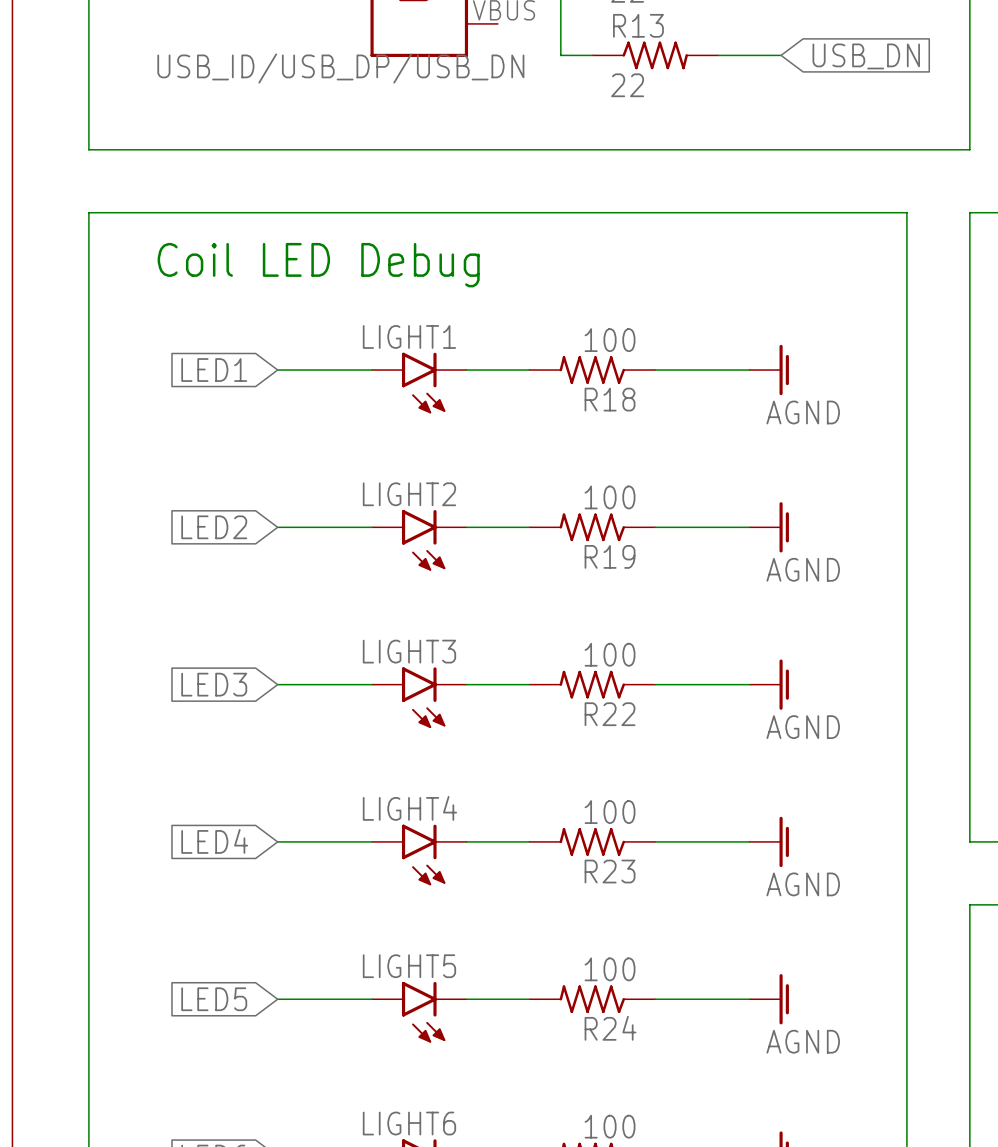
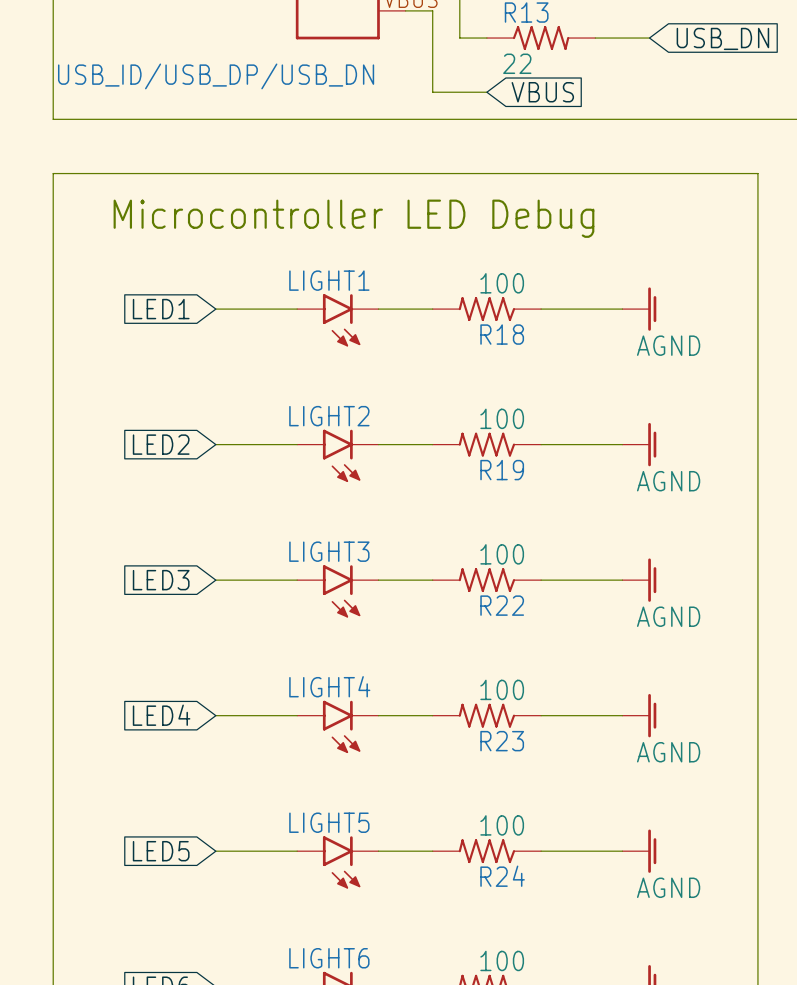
wire: none -> (405, 10) (432, 10) (432, 92) (486, 92)
USB_ID/USB_DP/USB_DN name position: USB_ID/USB_DP/USB_DN (340, 68) -> USB_ID/USB_DP/USB_DN (216, 76)
global label: none -> VBUS (542, 92)
text: Coil LED Debug (318, 265) -> Microcontroller LED Debug (353, 218)

